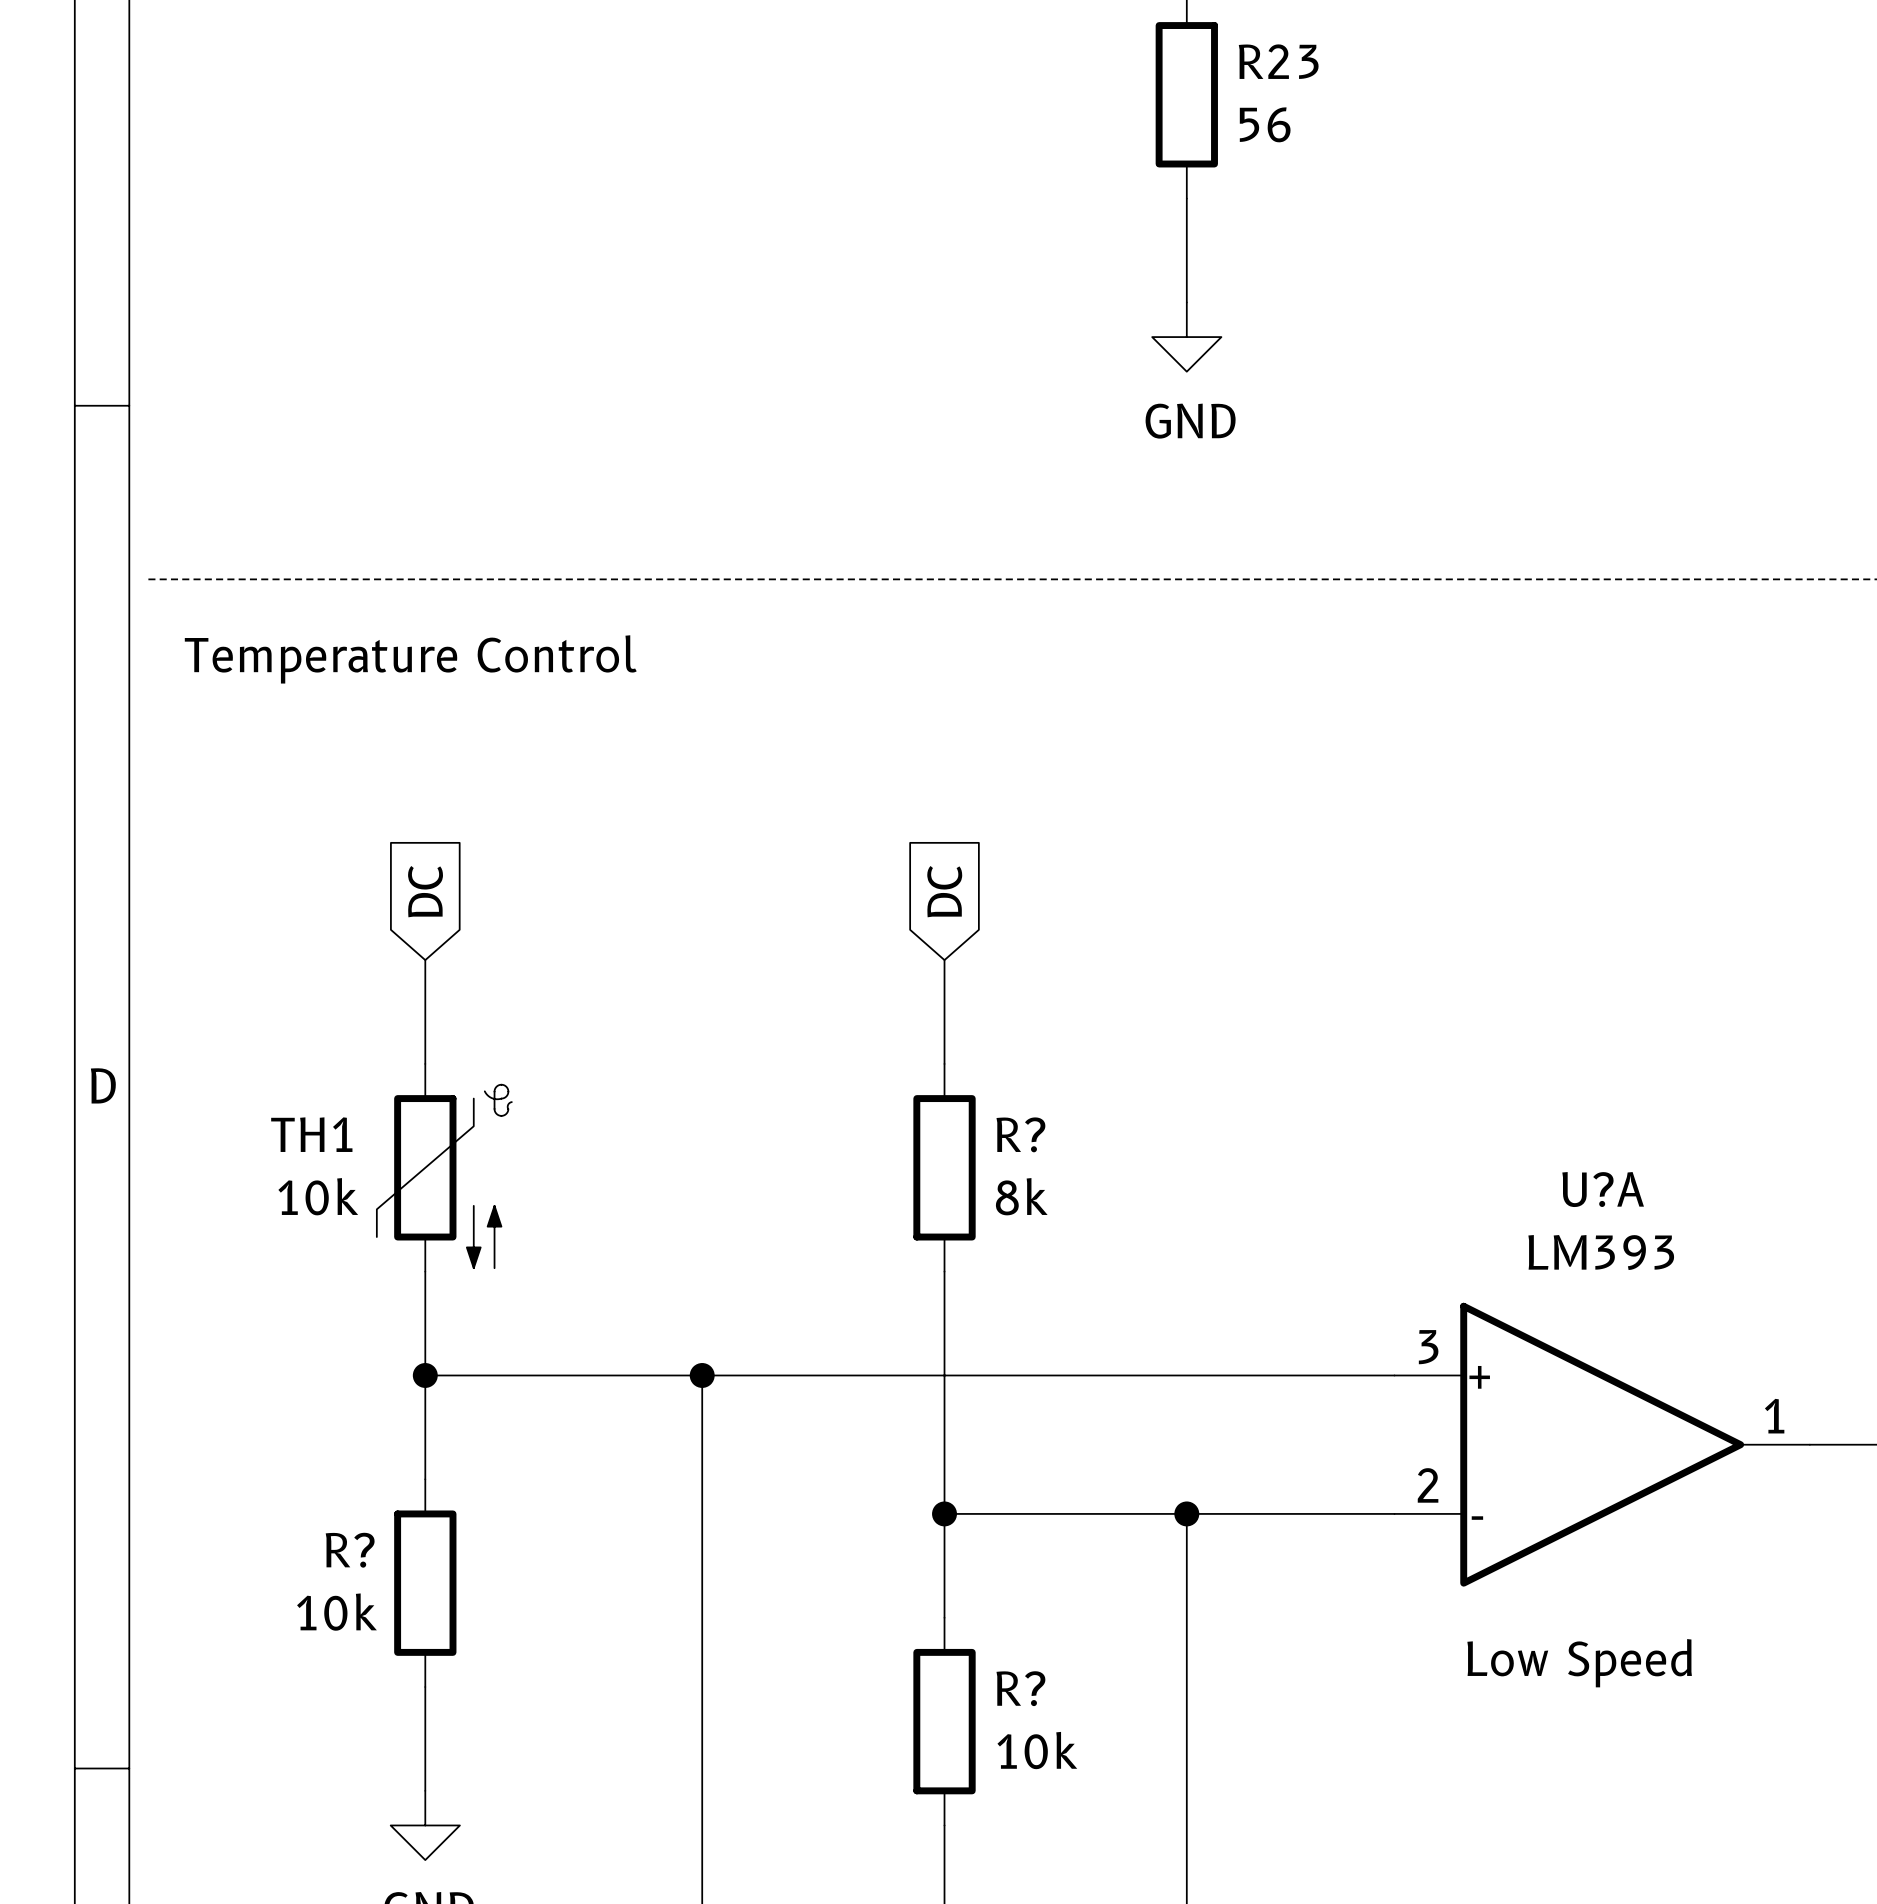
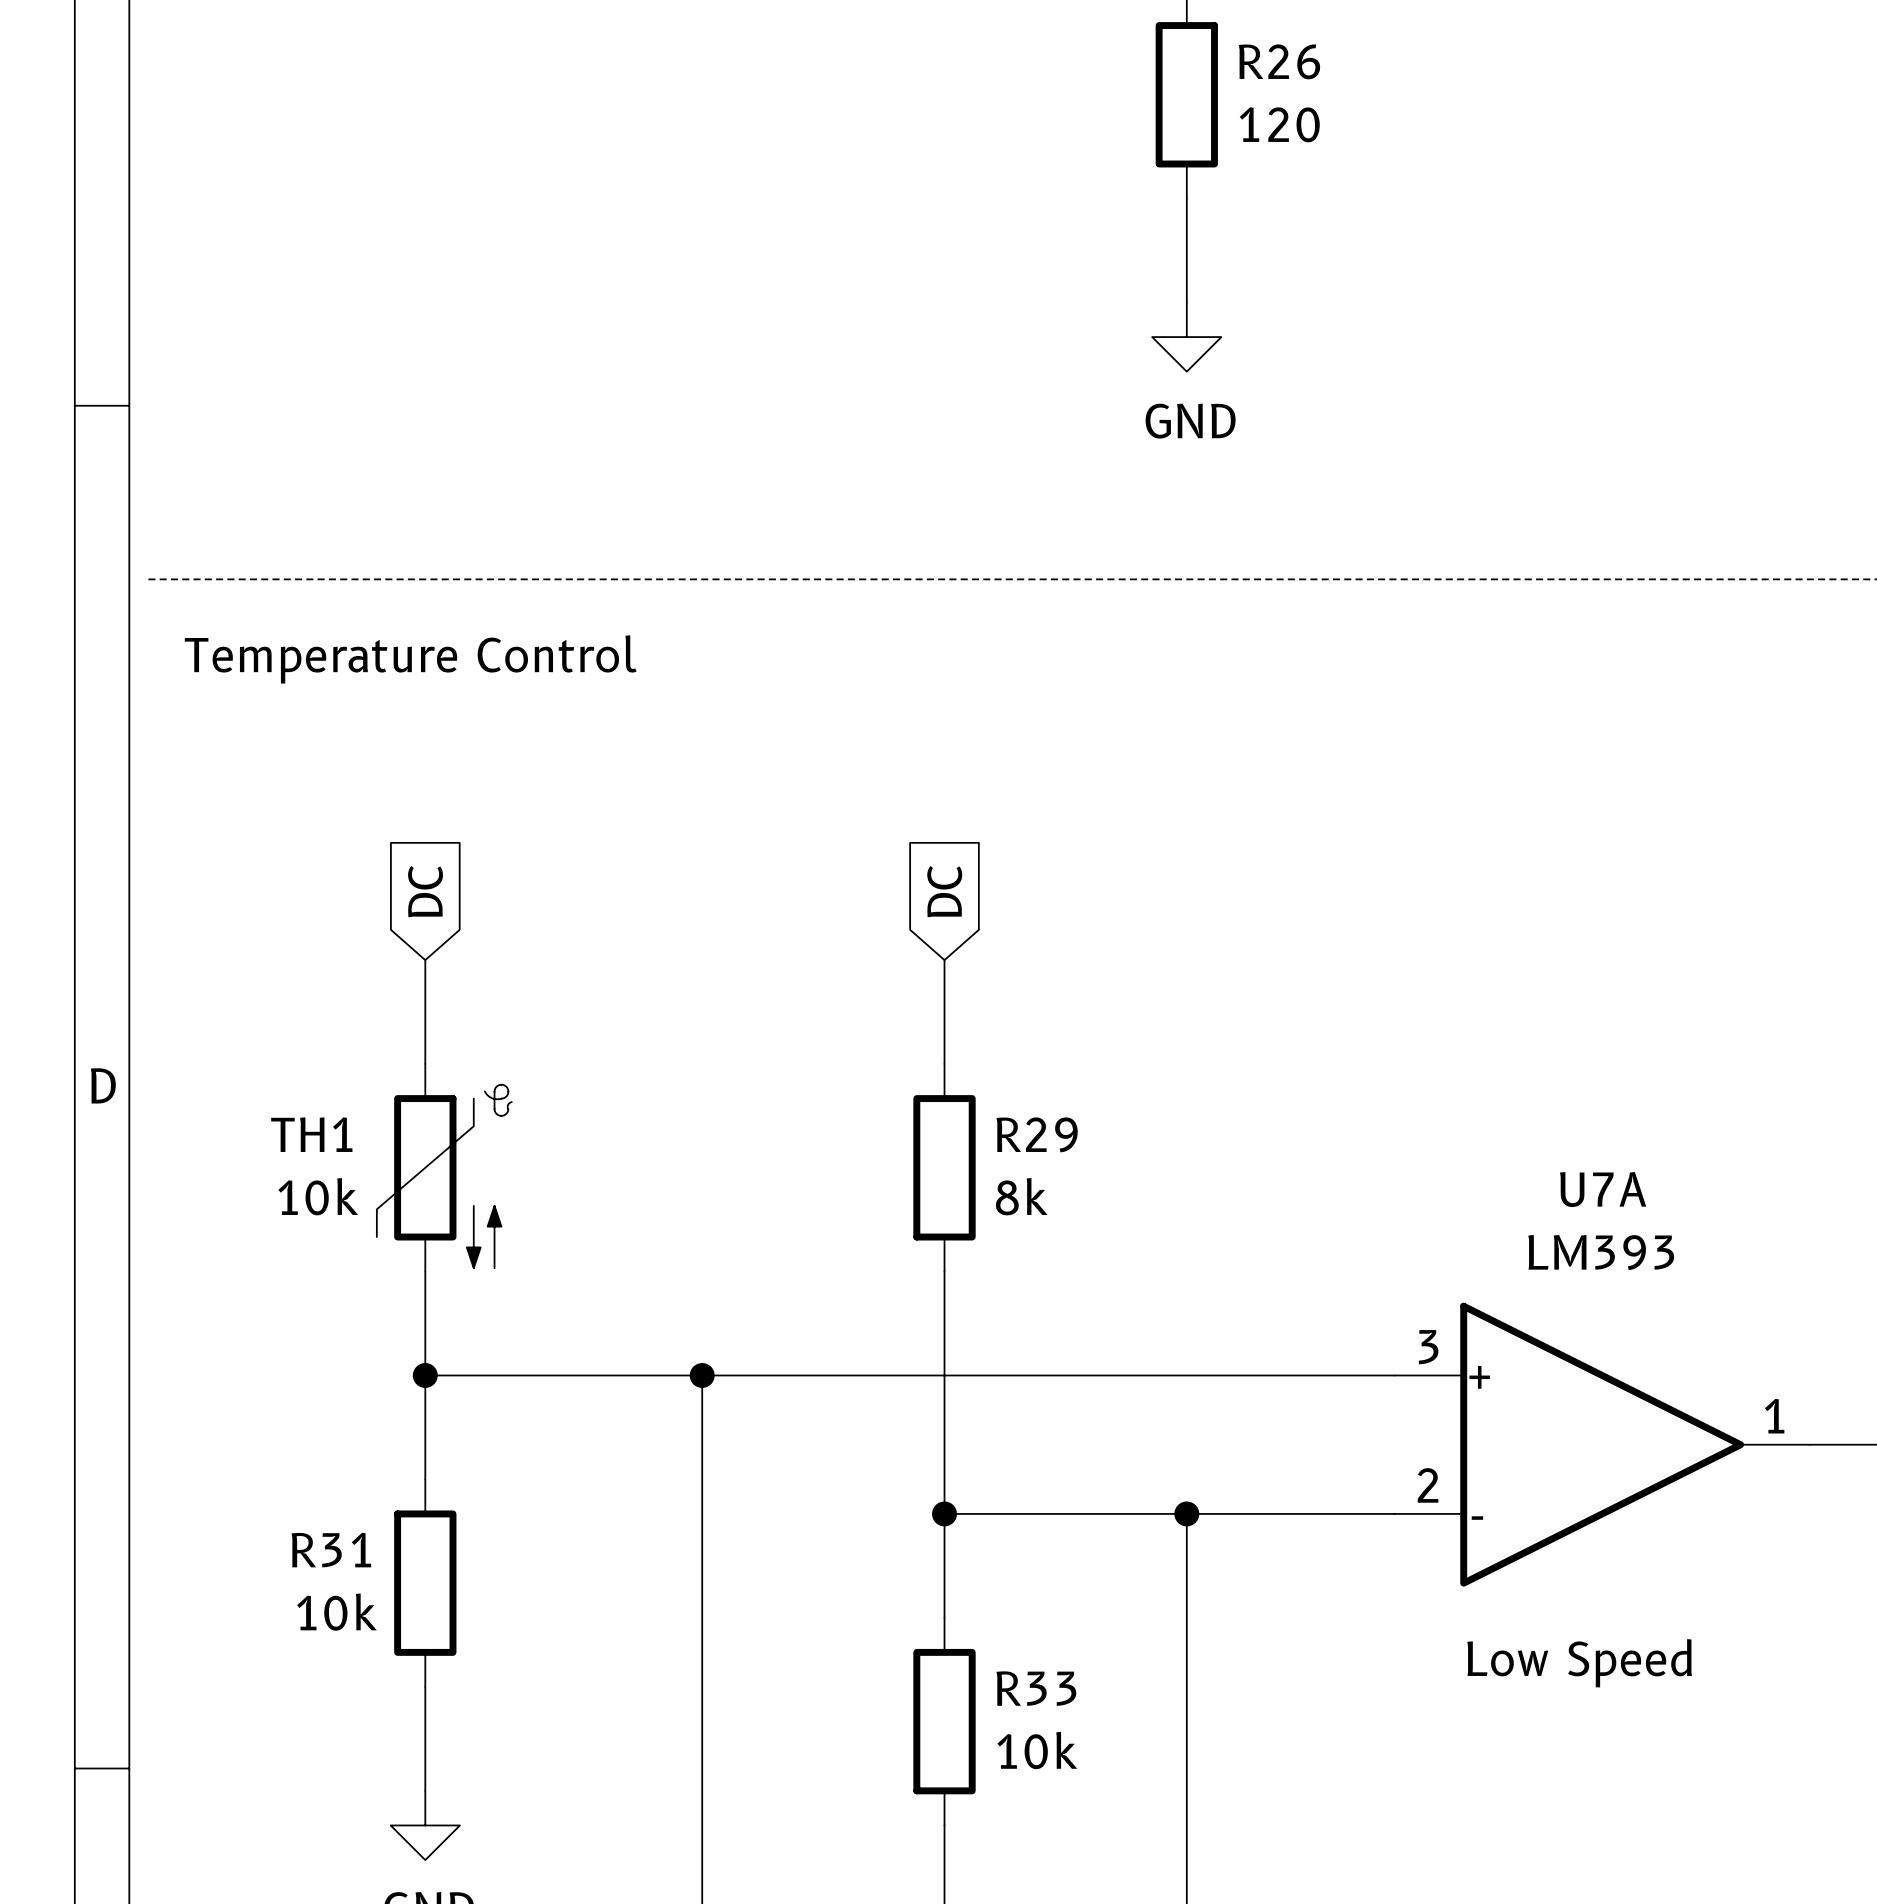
R23 name: R23 (1278, 61) -> R26 (1279, 61)
R23 value: 56 (1265, 124) -> 120 (1279, 124)
R? name: R? (1020, 1134) -> R29 (1037, 1134)
U?A name: U?A (1603, 1189) -> U7A (1603, 1189)
R? name: R? (350, 1550) -> R31 (331, 1550)
R? name: R? (1020, 1688) -> R33 (1036, 1688)

